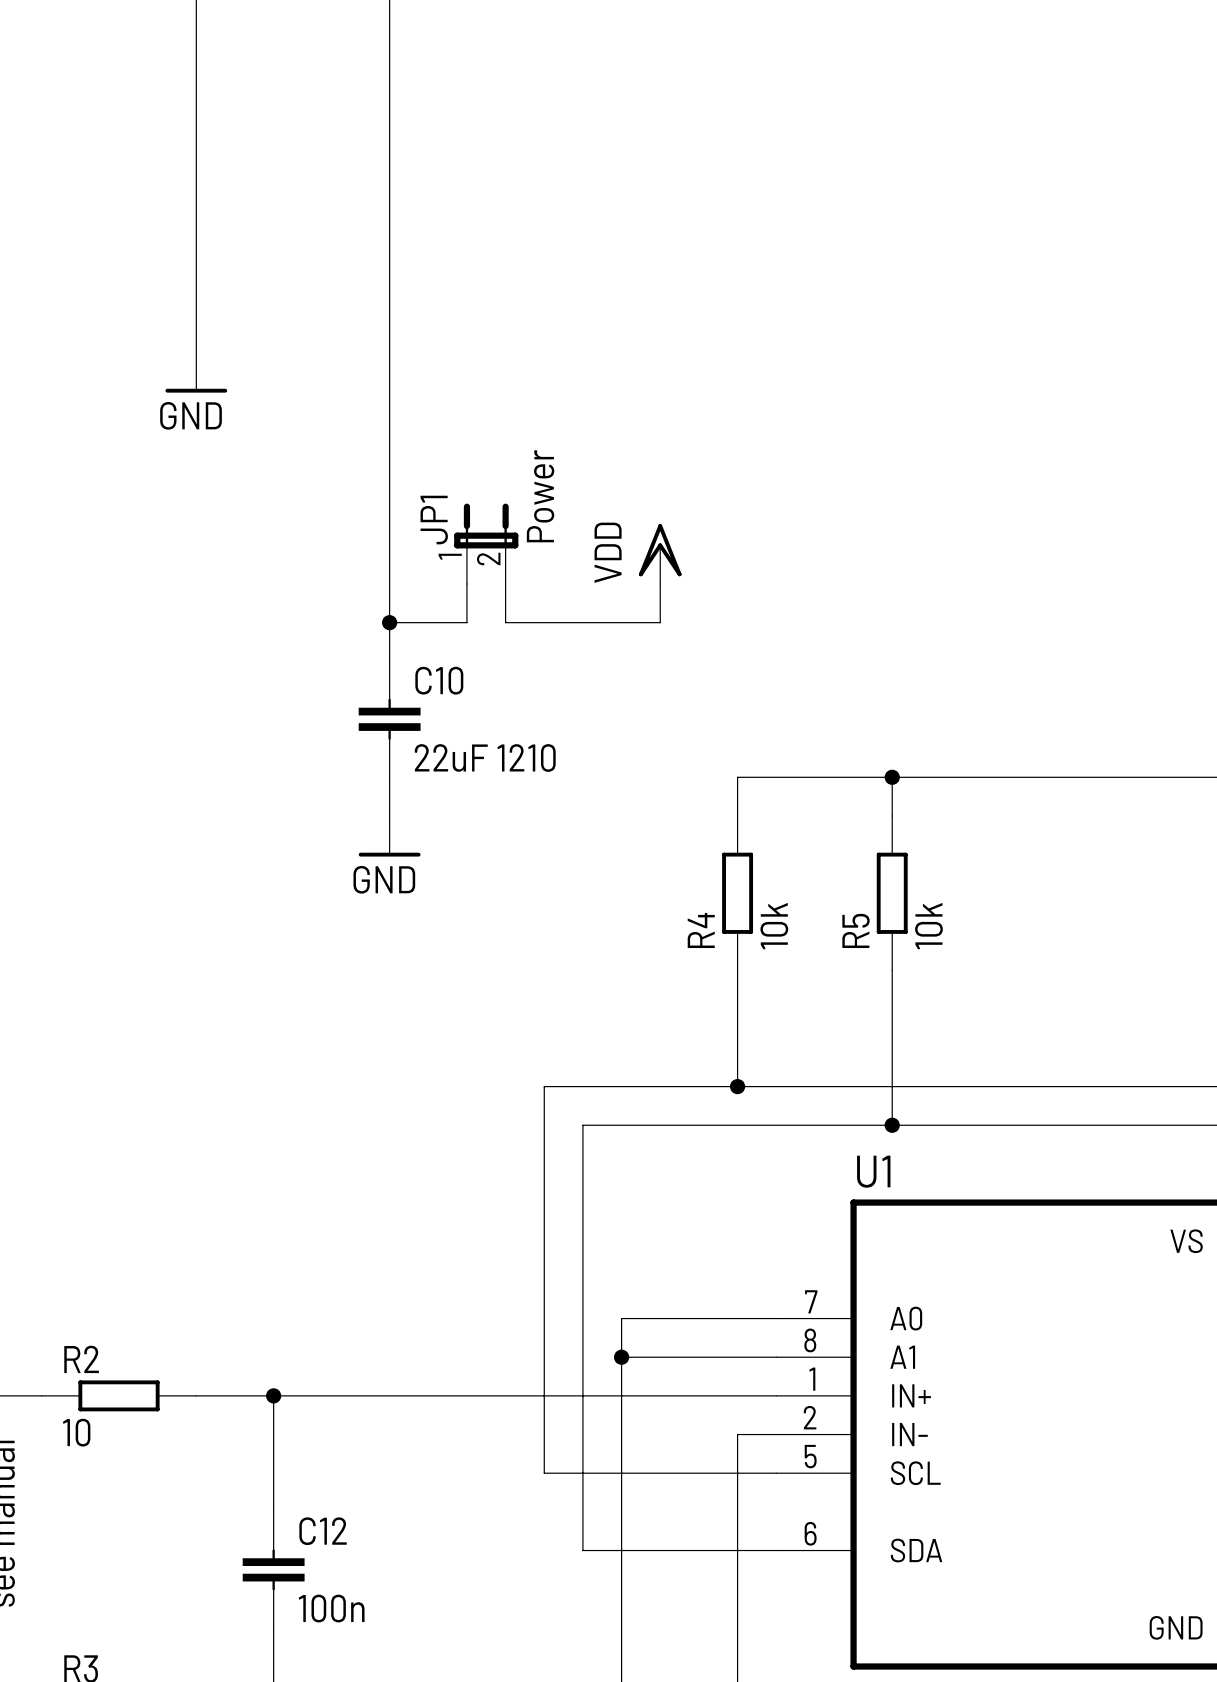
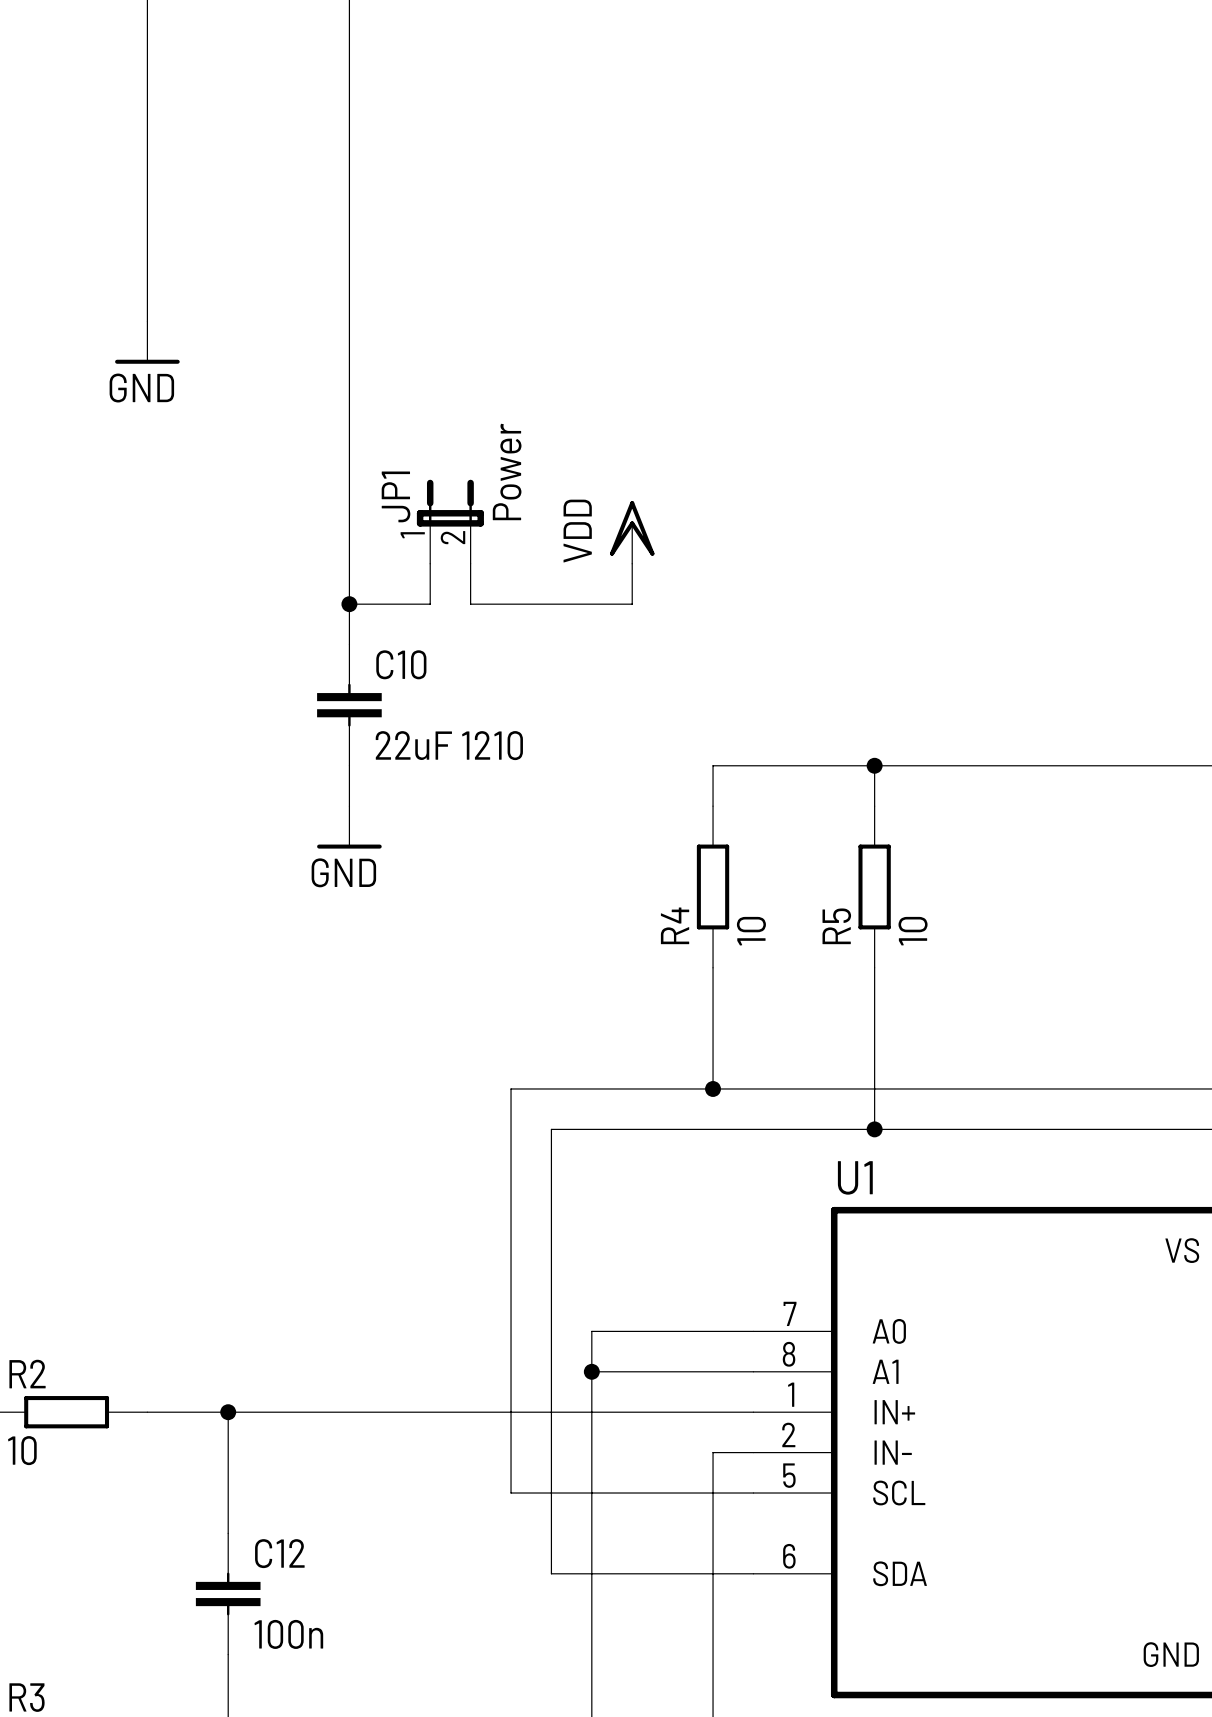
R4 value: 10k (774, 926) -> 10 (751, 931)
R5 value: 10k (928, 926) -> 10 (913, 931)

